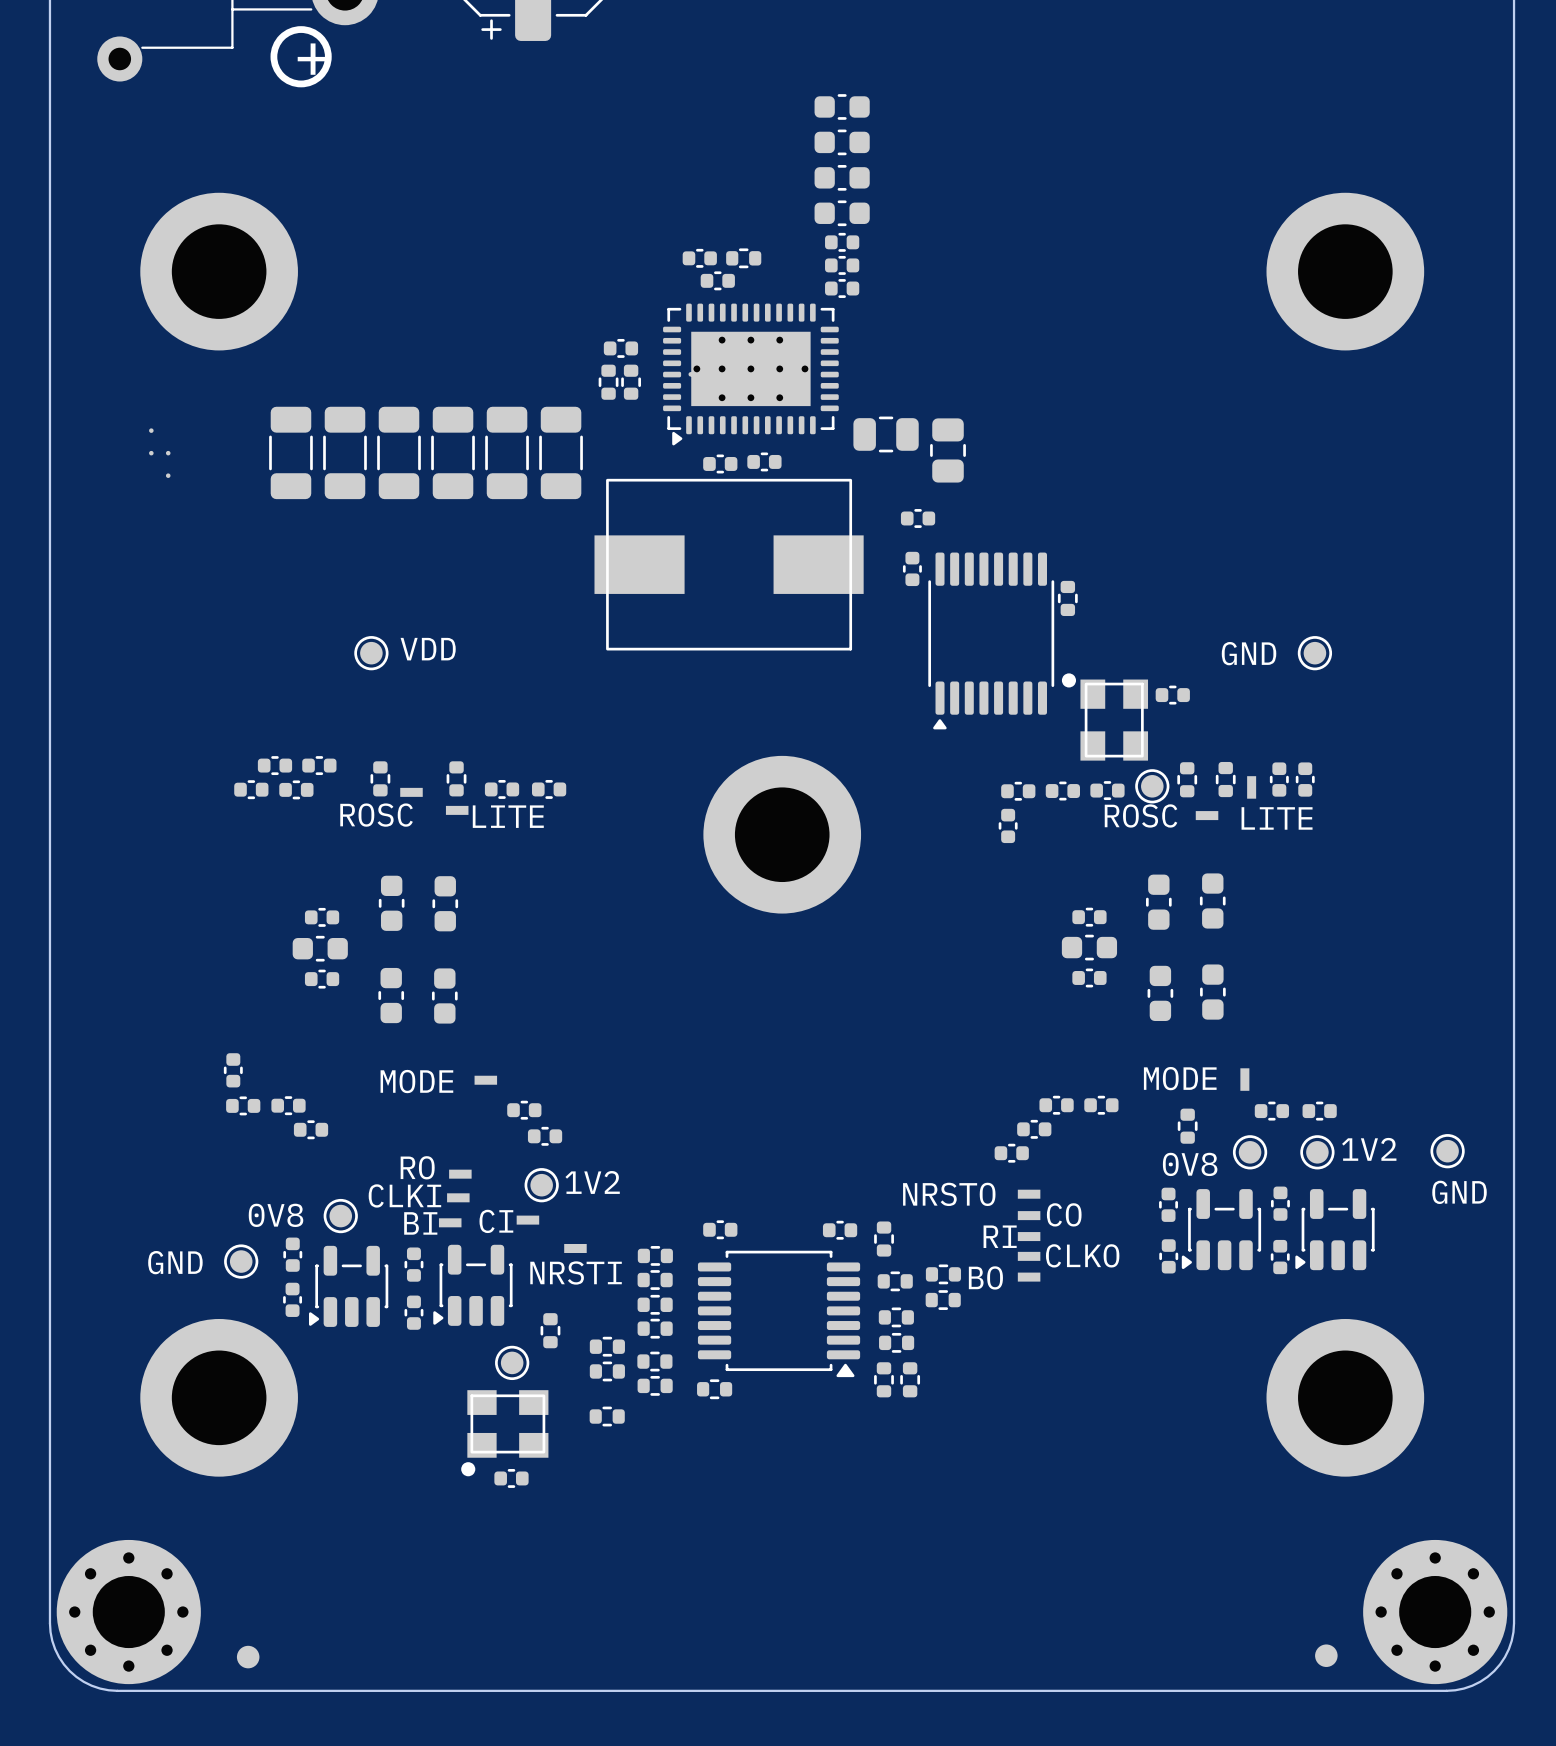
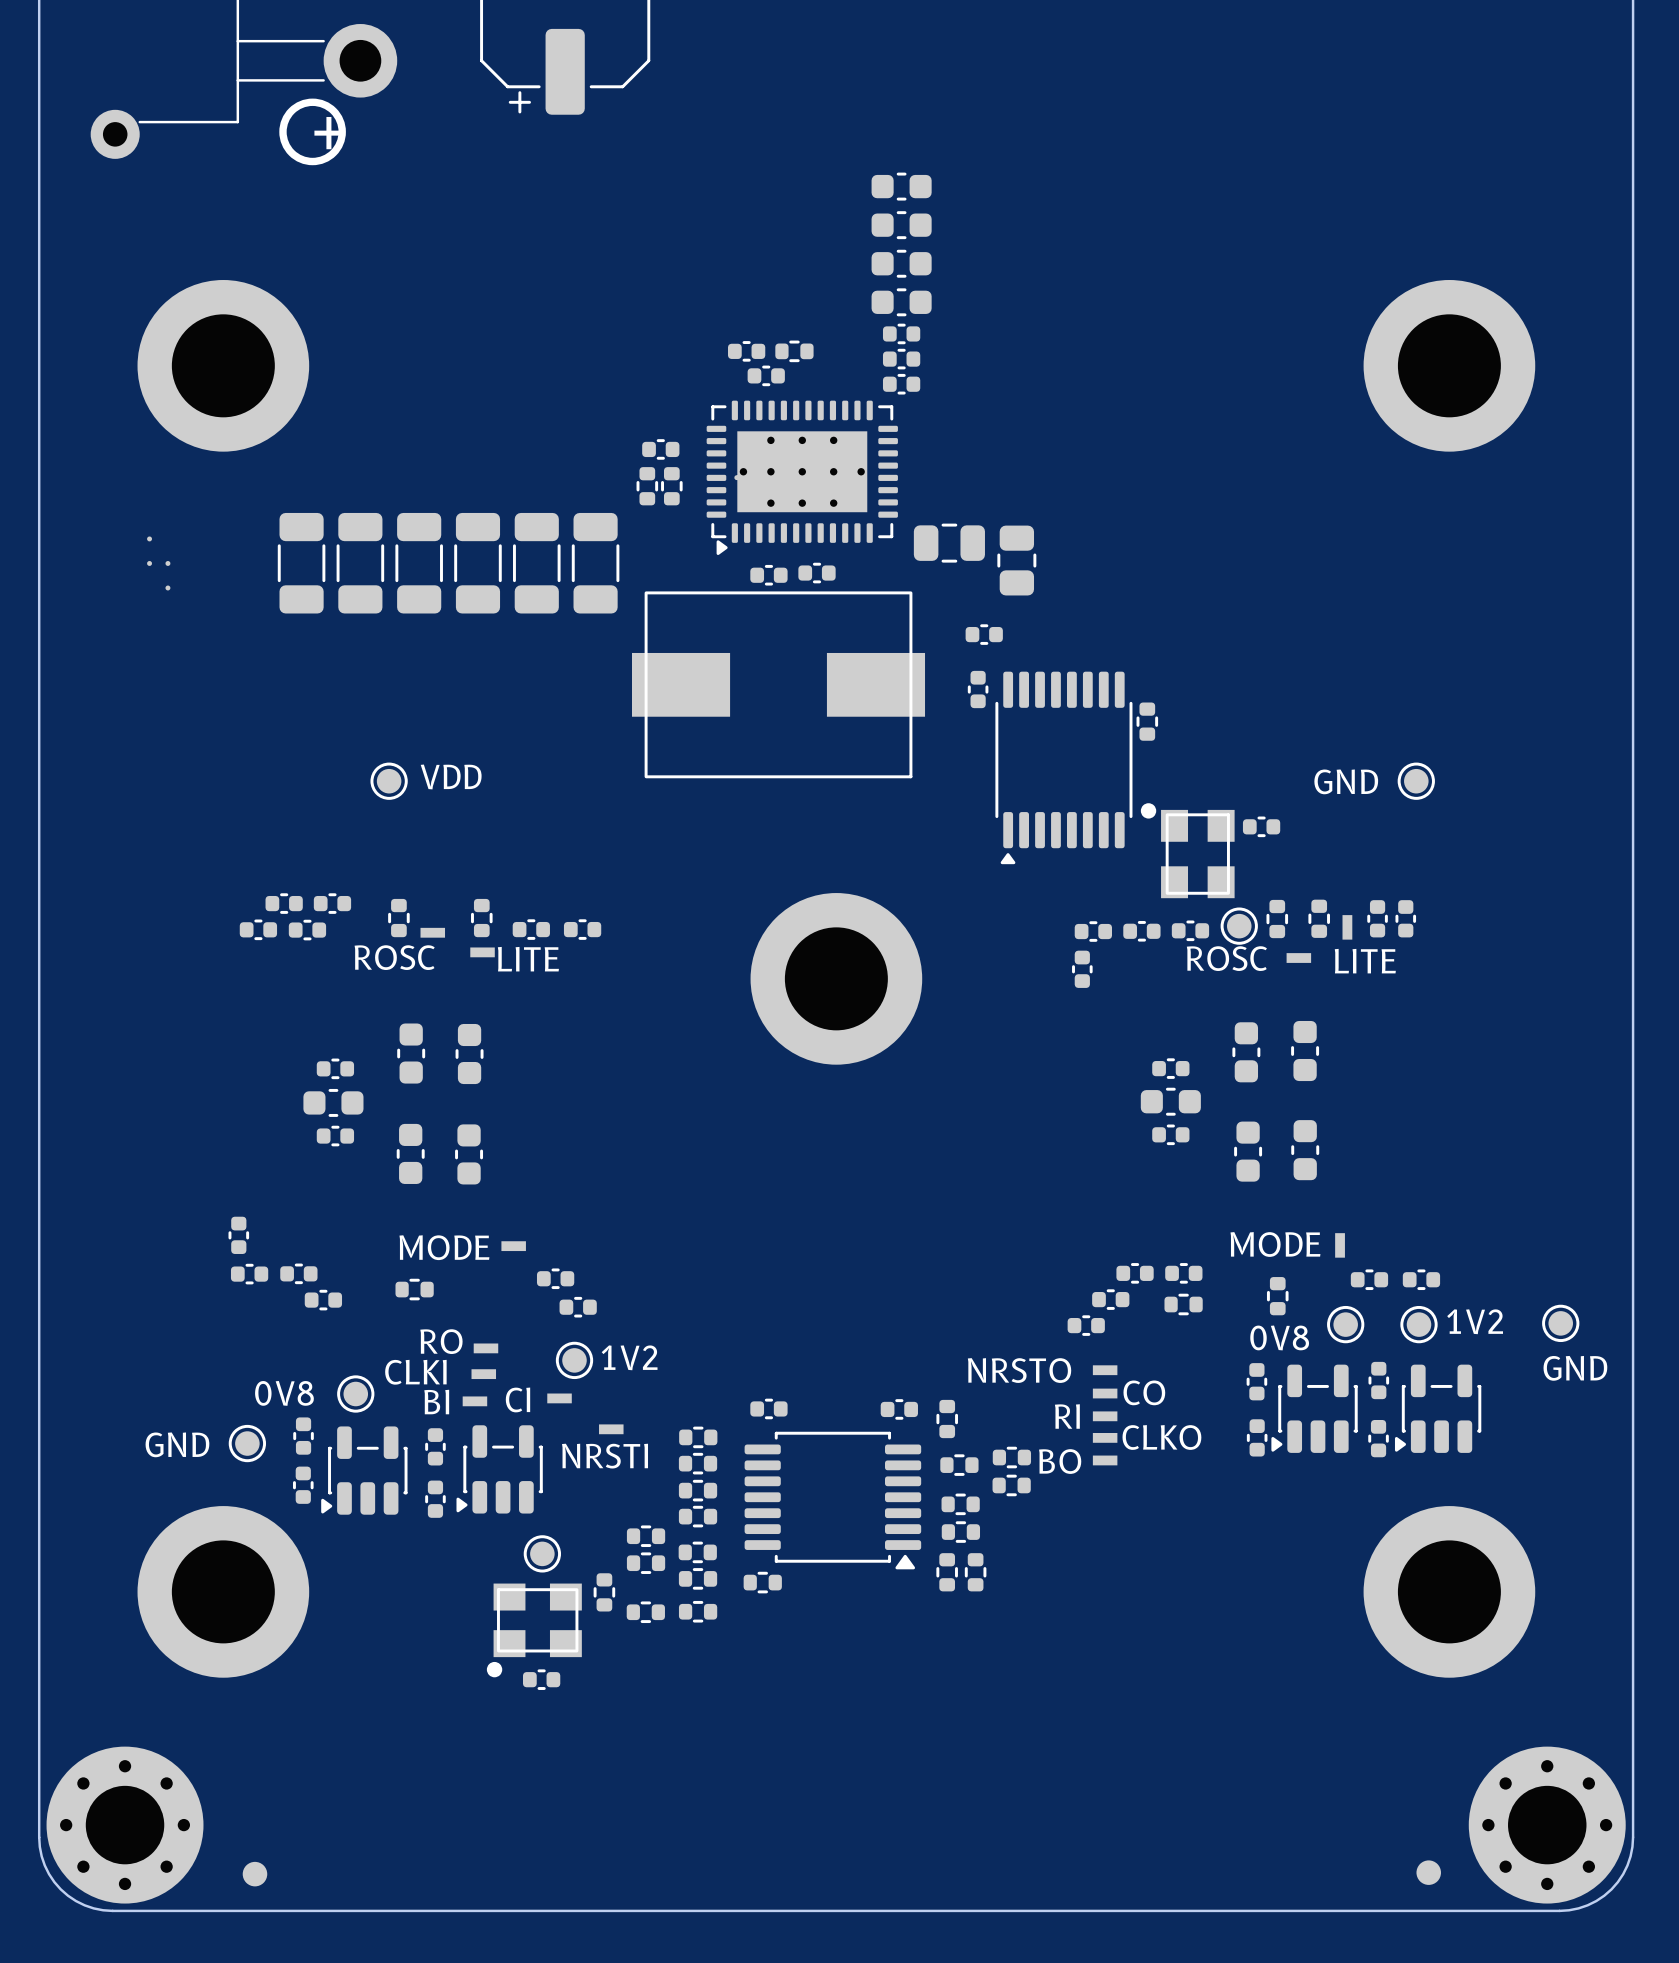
part: none -> (414, 1289)
part: none -> (1183, 1304)
part: (550, 1330) -> none
part: none -> (604, 1592)
part: none -> (698, 1611)

